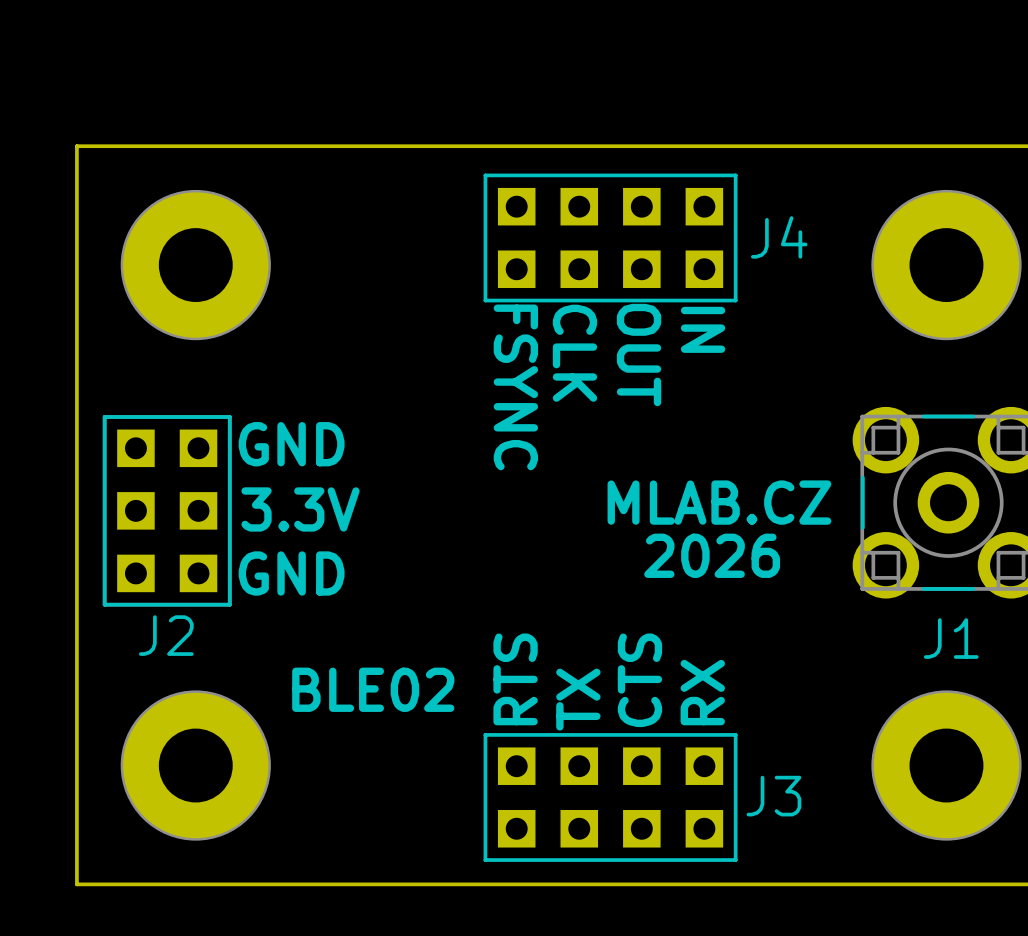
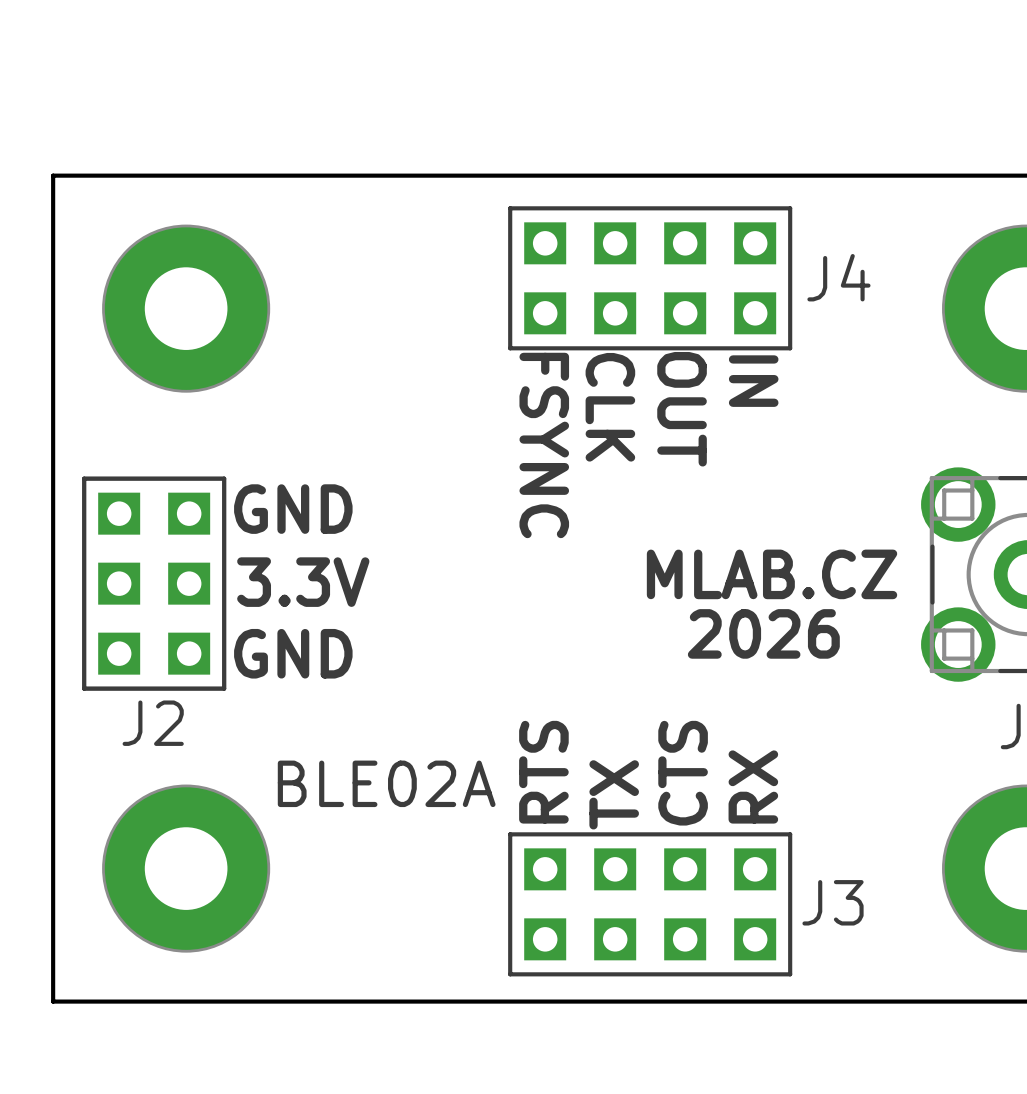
text: BLE02 (373, 689) -> BLE02A (386, 783)

